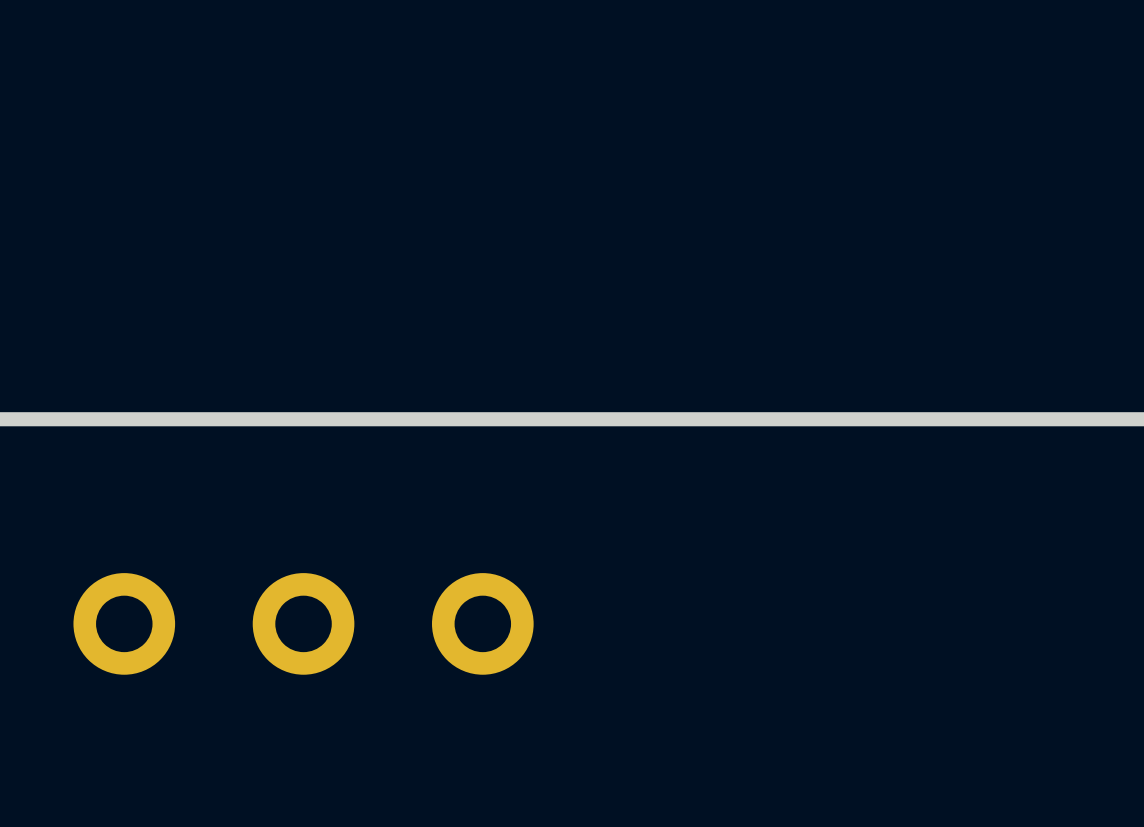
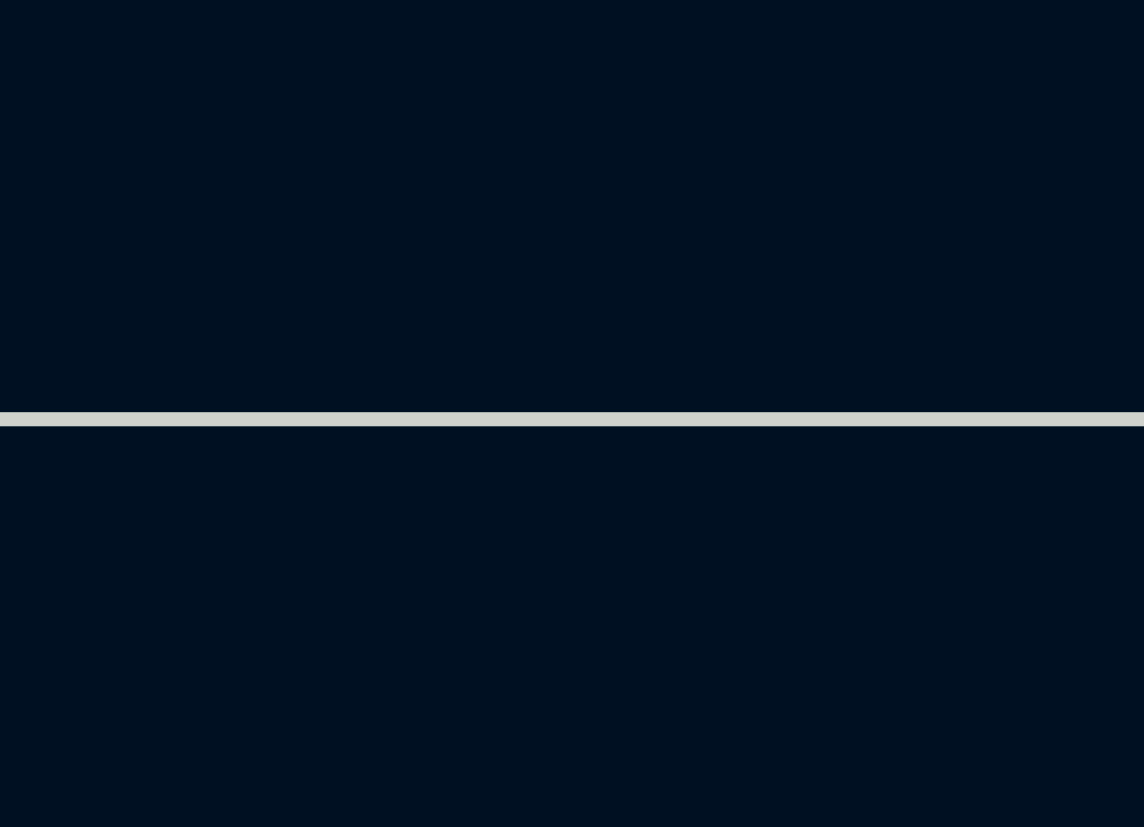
part: (303, 623) -> none

